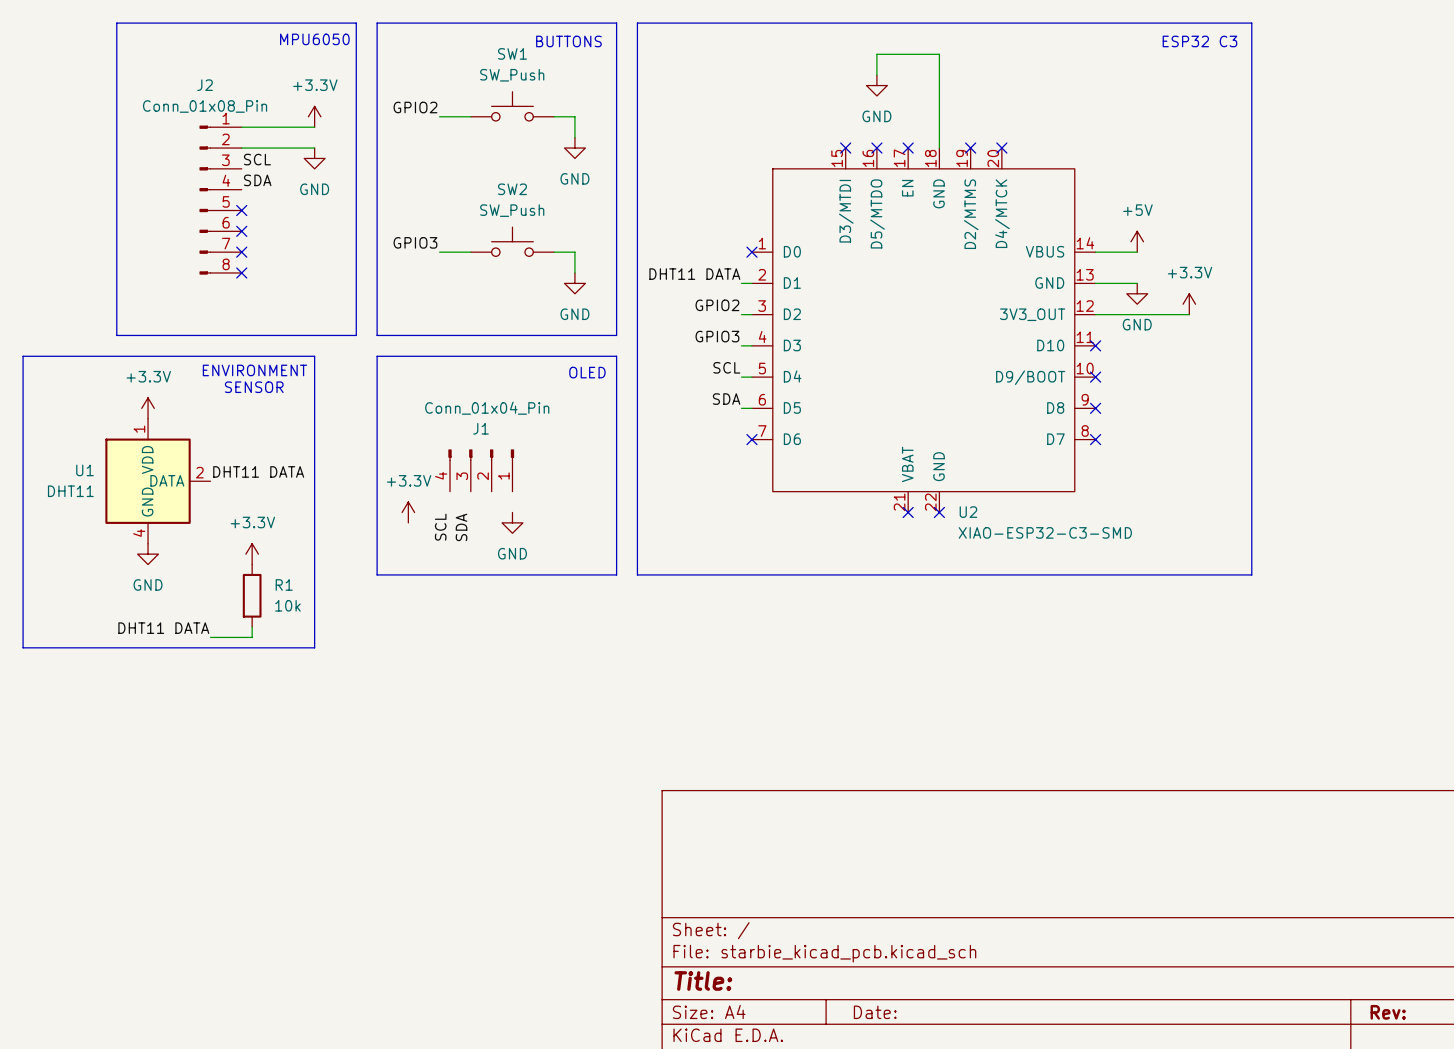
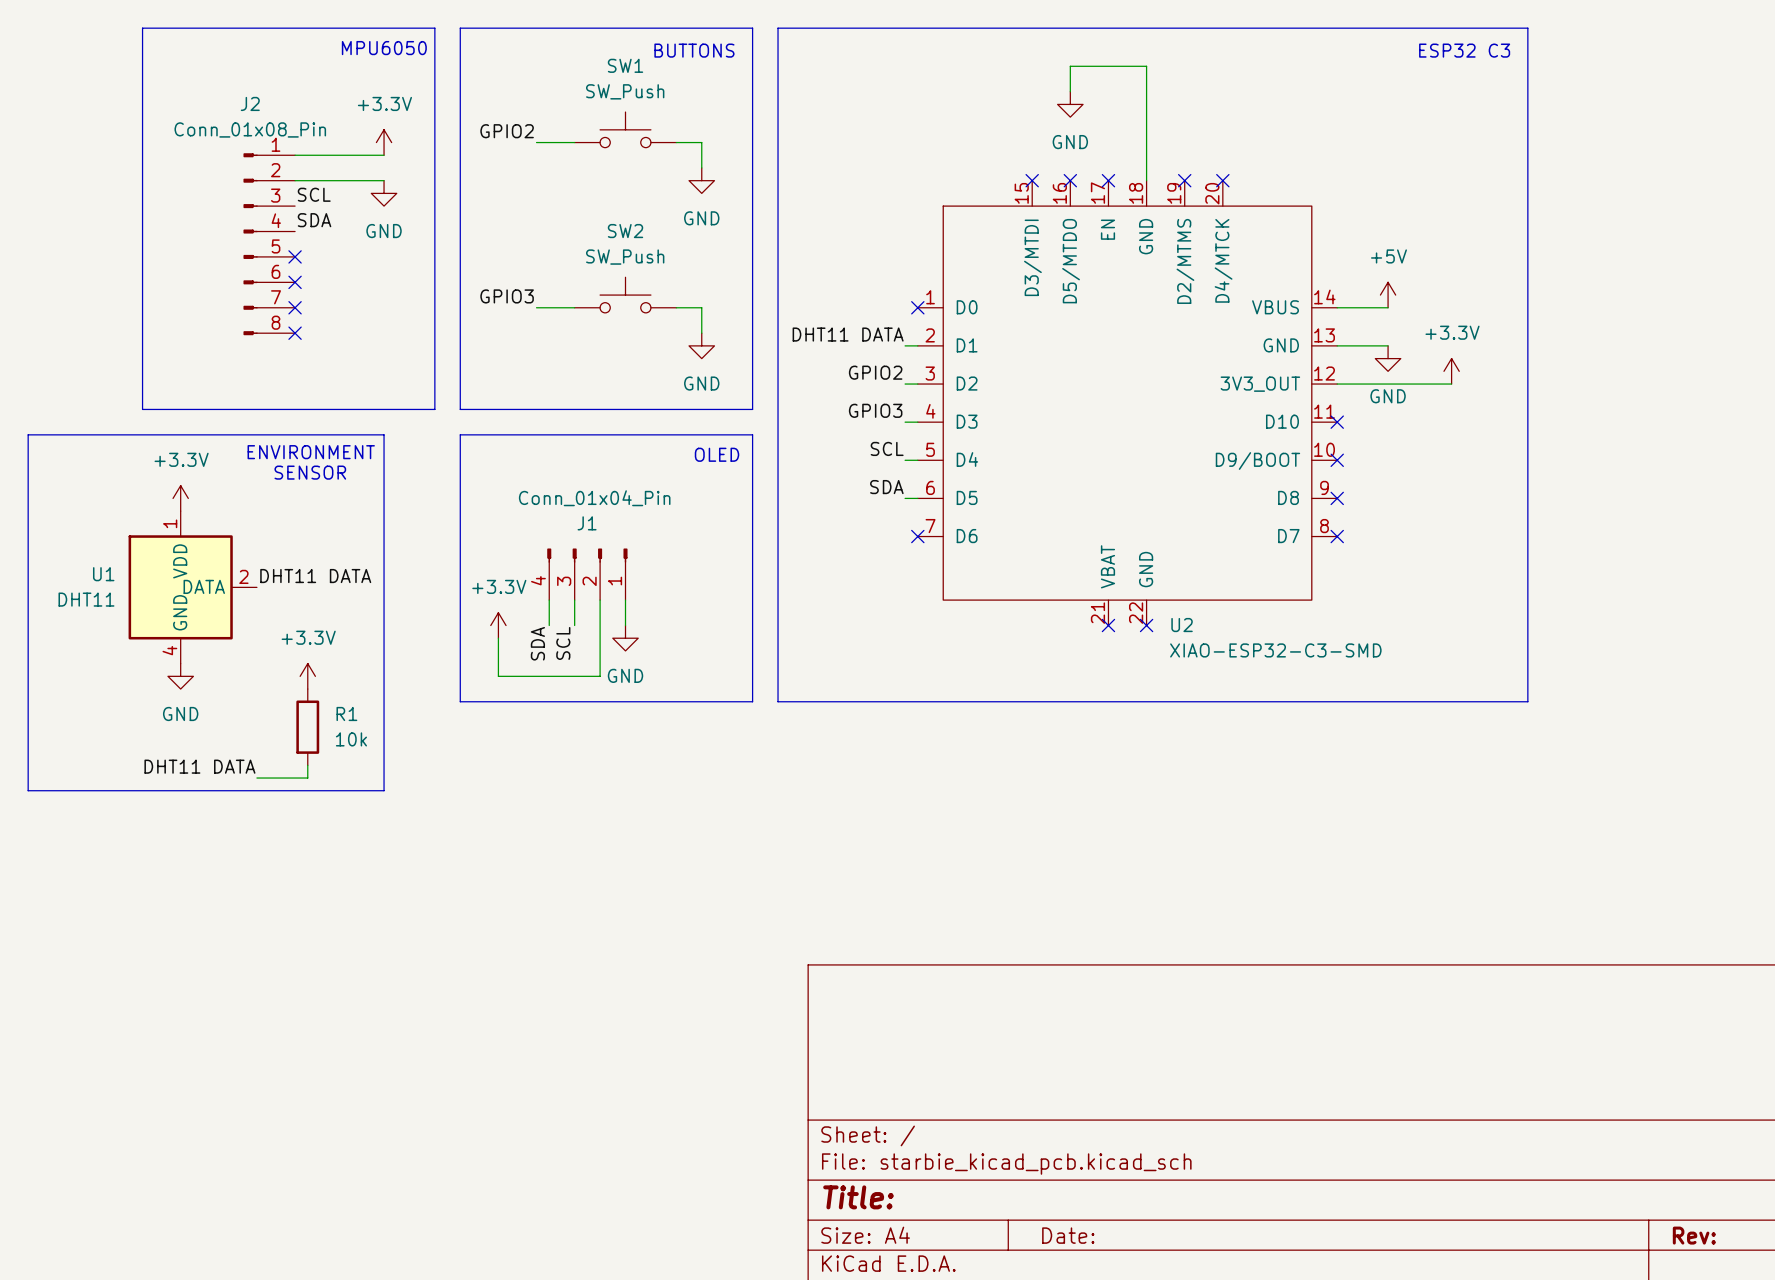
wire: none -> (549, 600) (549, 625)
wire: none -> (574, 600) (574, 625)
wire: none -> (600, 600) (600, 676) (498, 676) (498, 638)
wire: none -> (625, 600) (625, 625)
label: SCL (440, 527) -> SDA (537, 643)
label: SDA (461, 527) -> SCL (563, 643)

